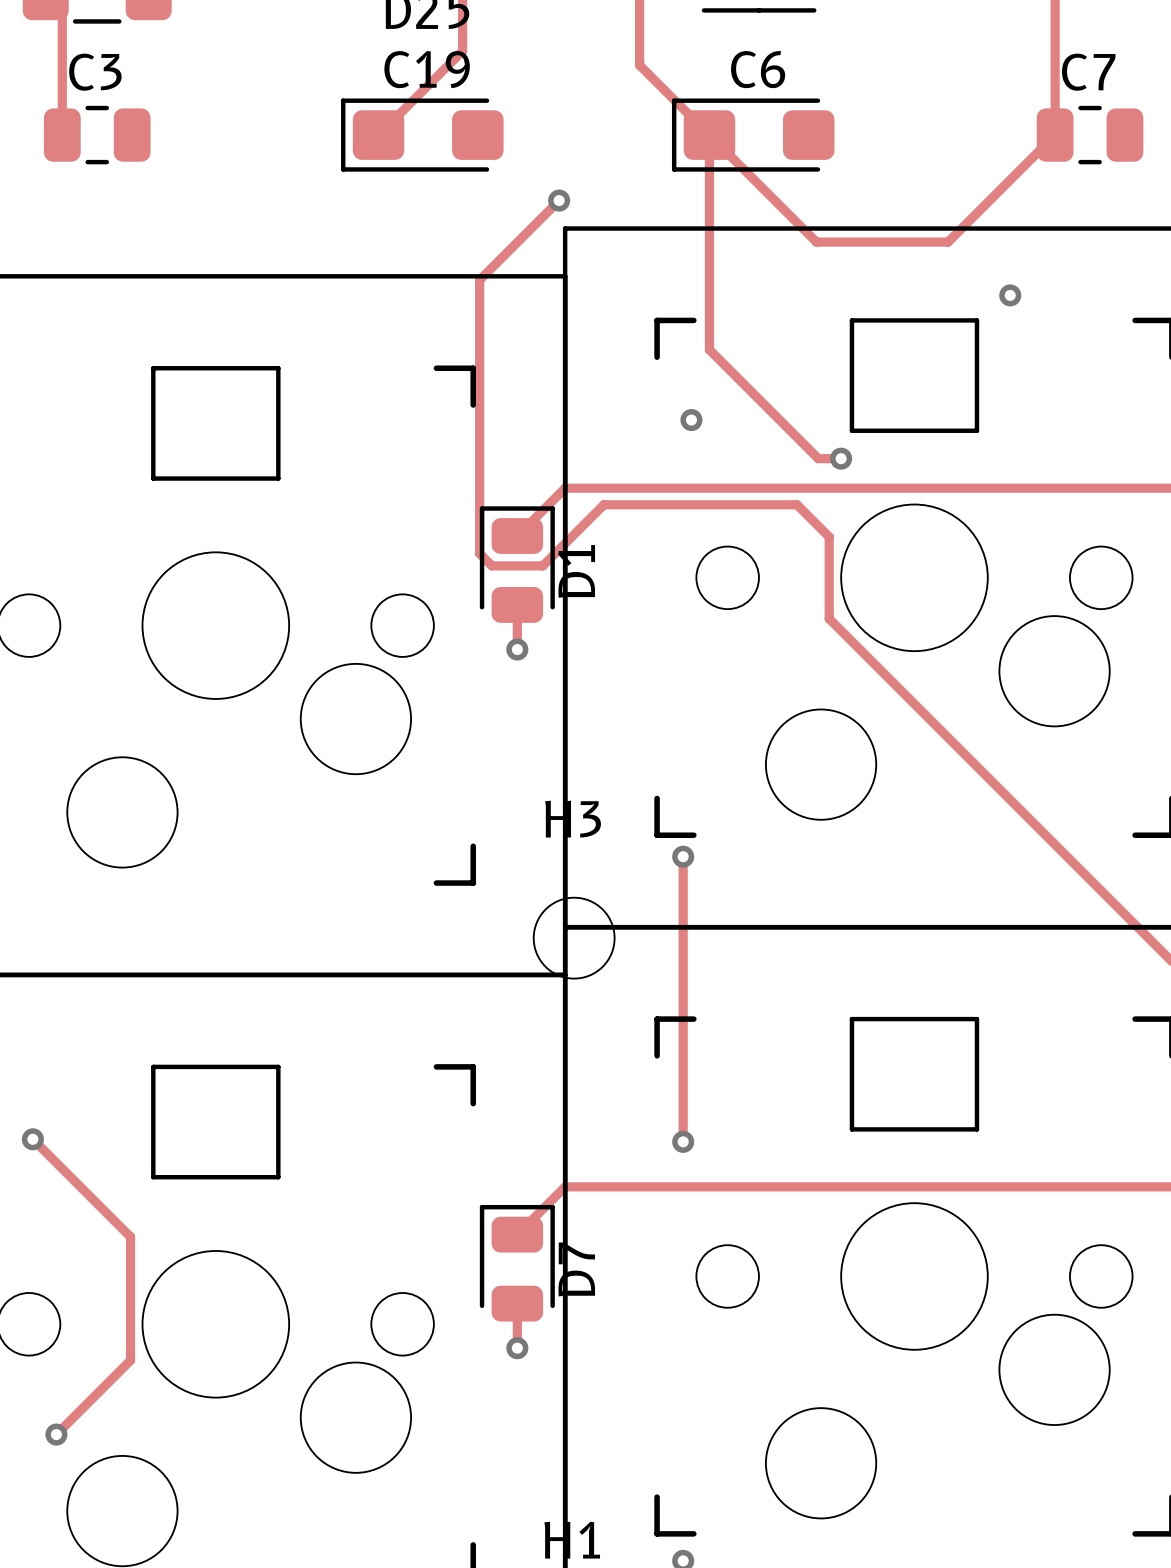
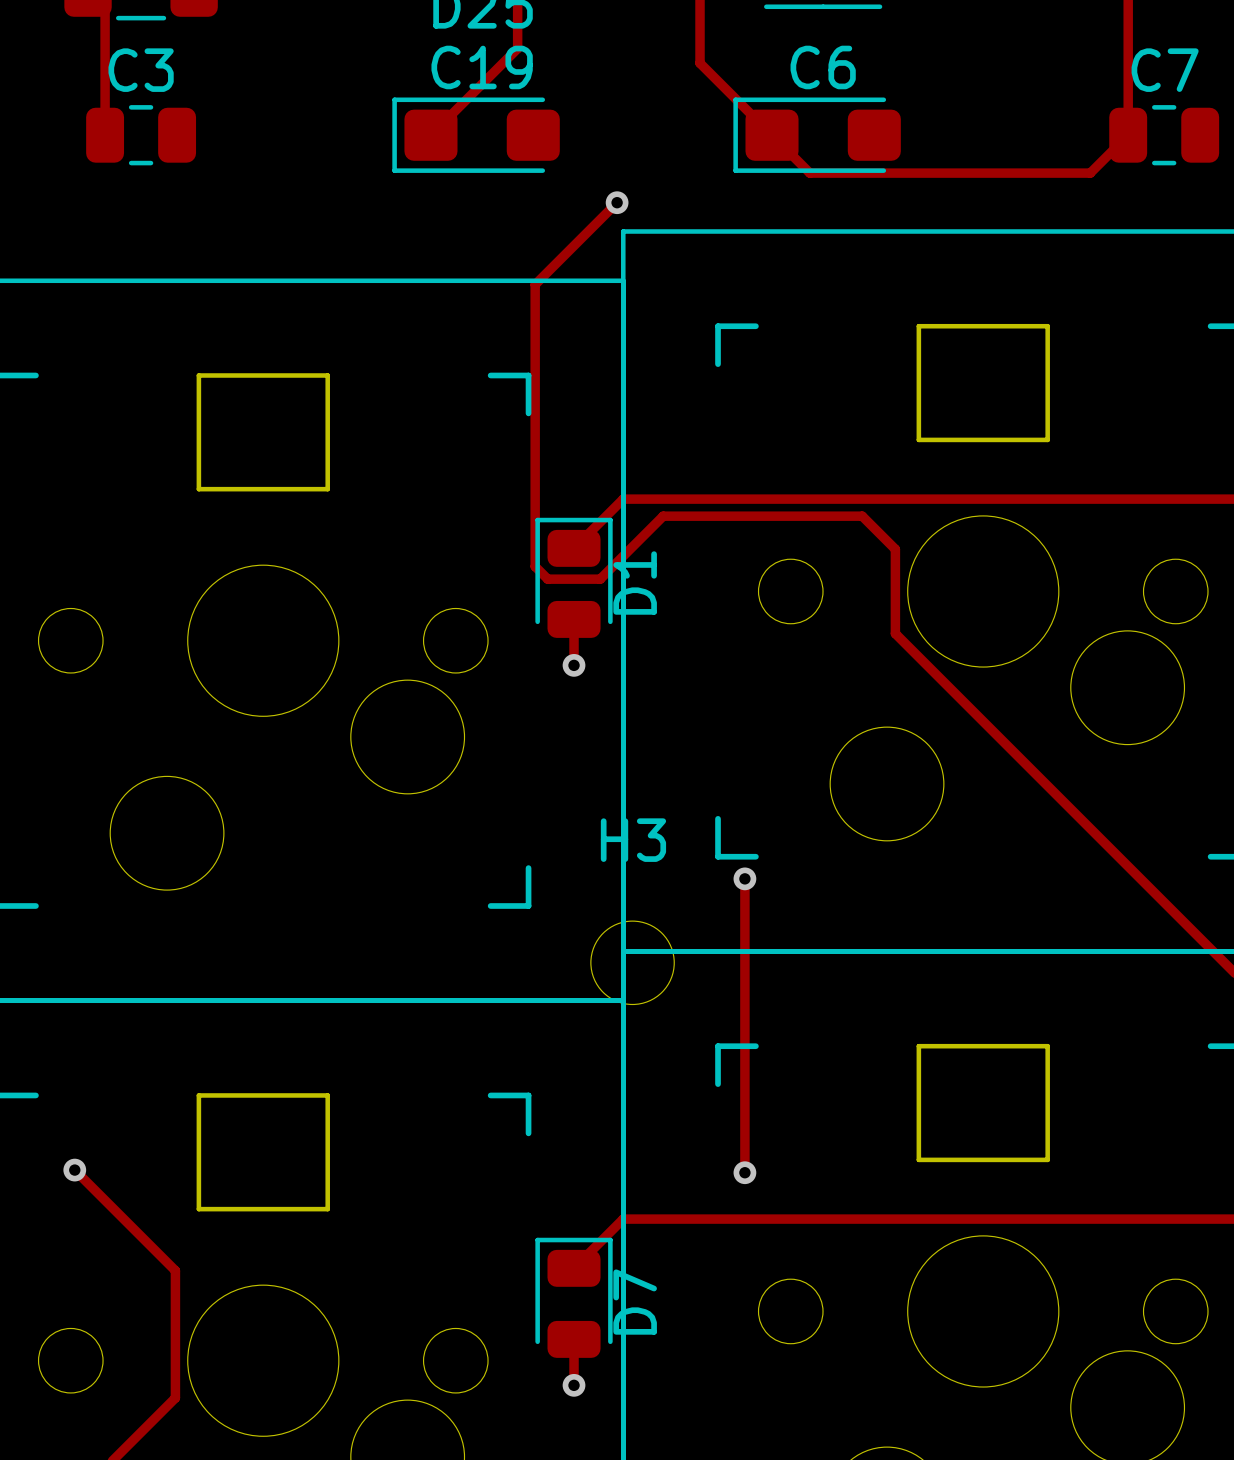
track: (709, 135) (709, 349) (818, 458) (841, 458) -> none
track: (746, 171) (816, 242) (948, 242) (1018, 171) -> (809, 173) (1090, 173)
via: (1010, 295) -> none
via: (691, 420) -> none
via: (841, 458) -> none

